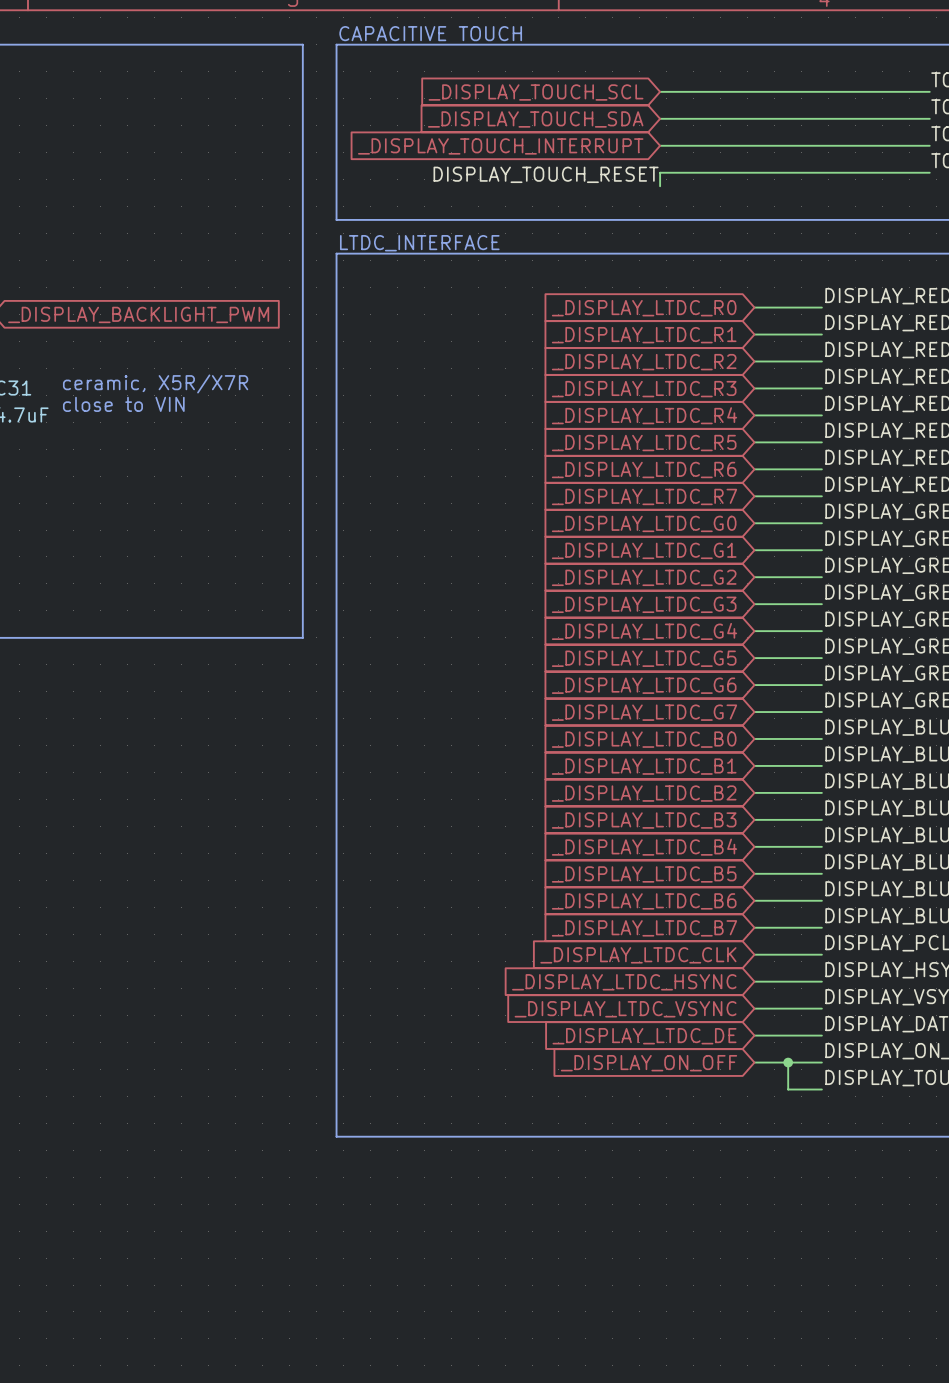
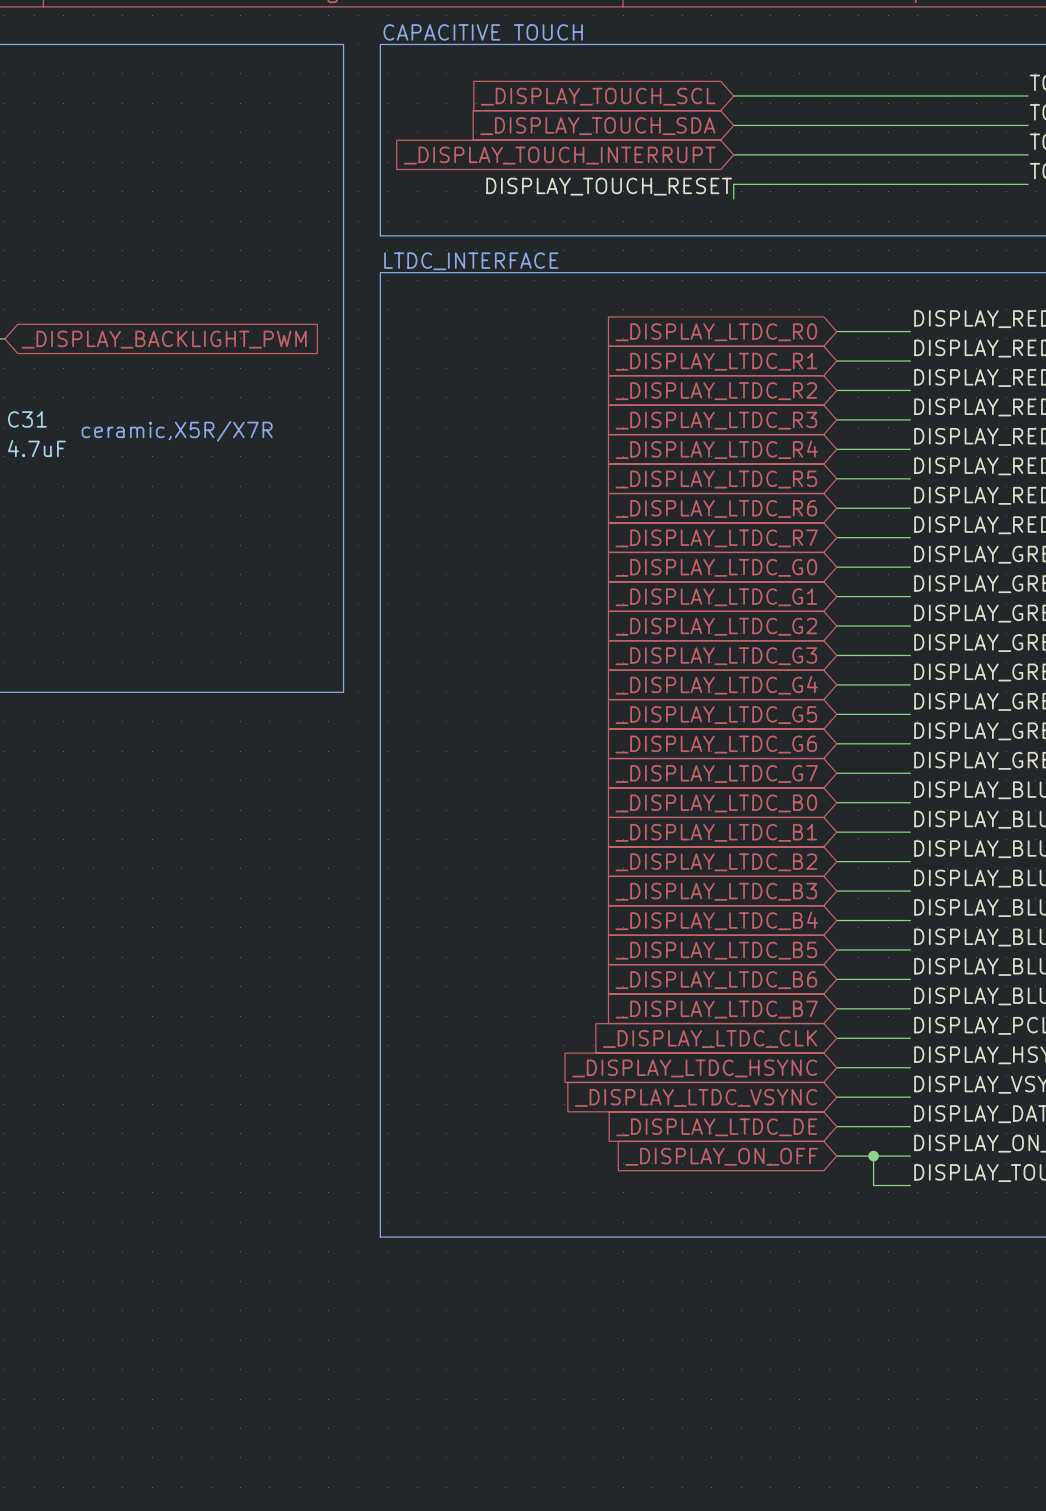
text: ceramic, X5R/X7R (155, 383) -> none
text: close to VIN (123, 404) -> ceramic,X5R/X7R (177, 431)

